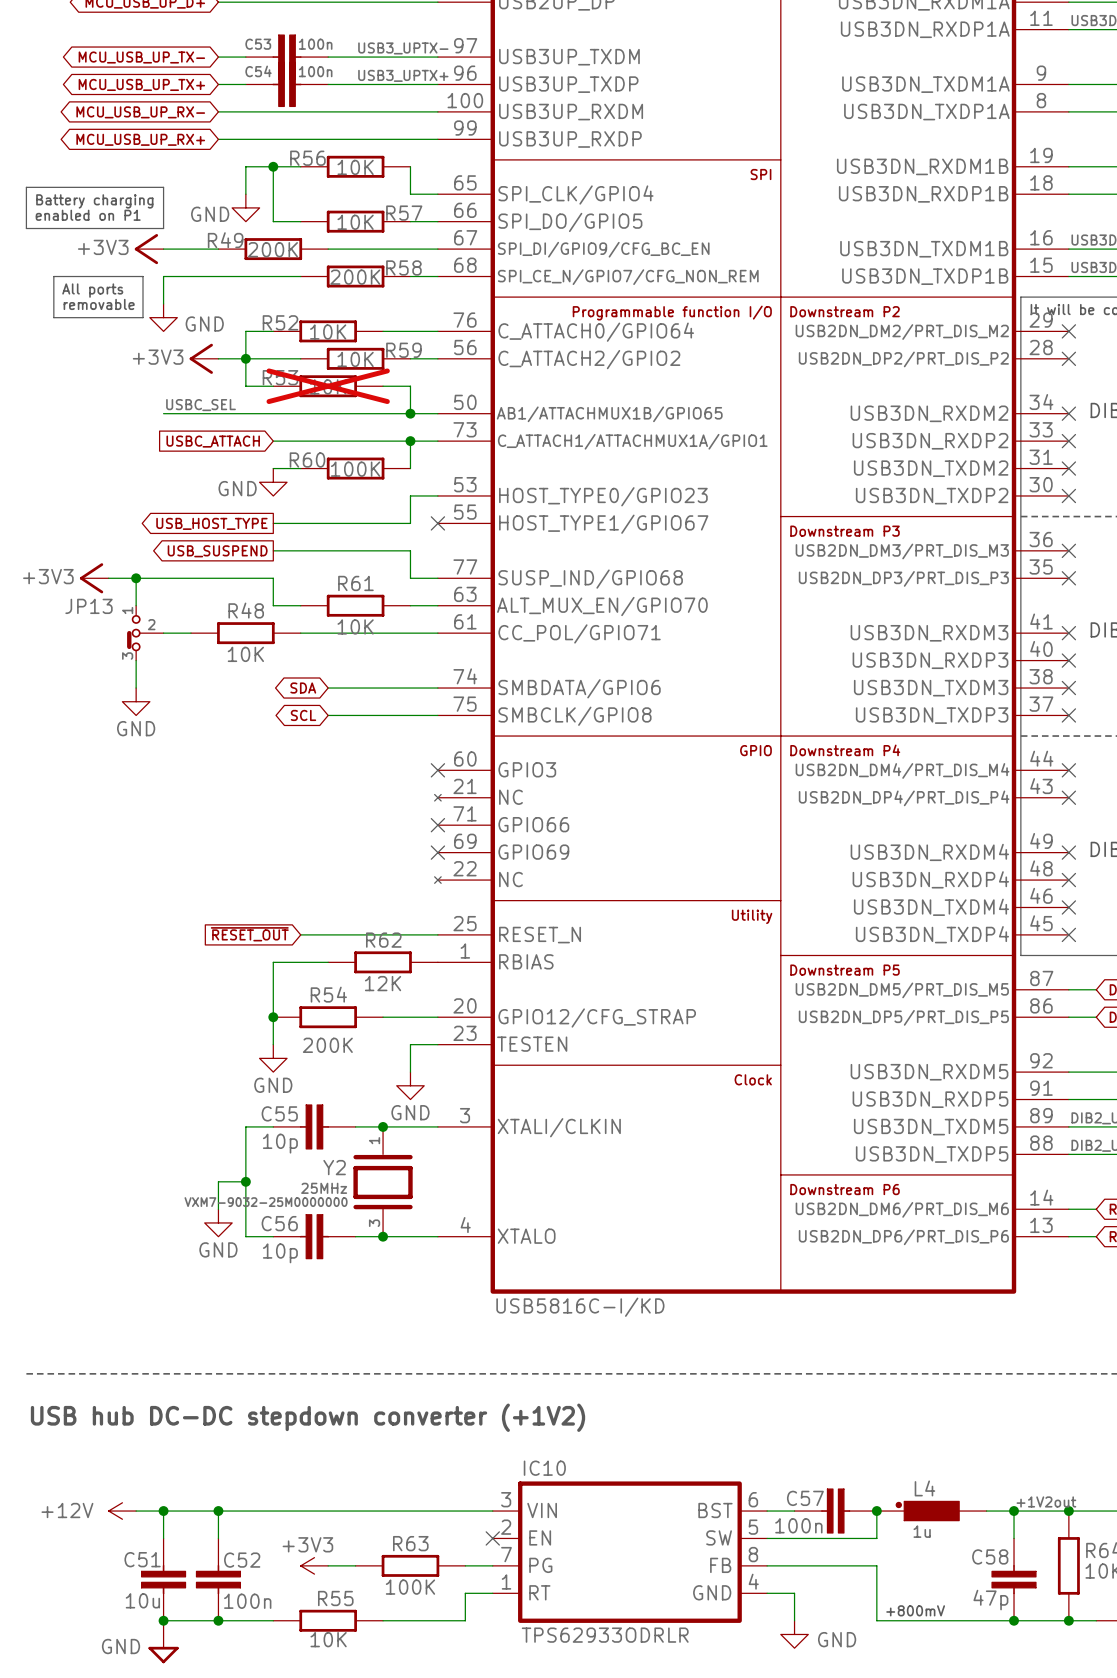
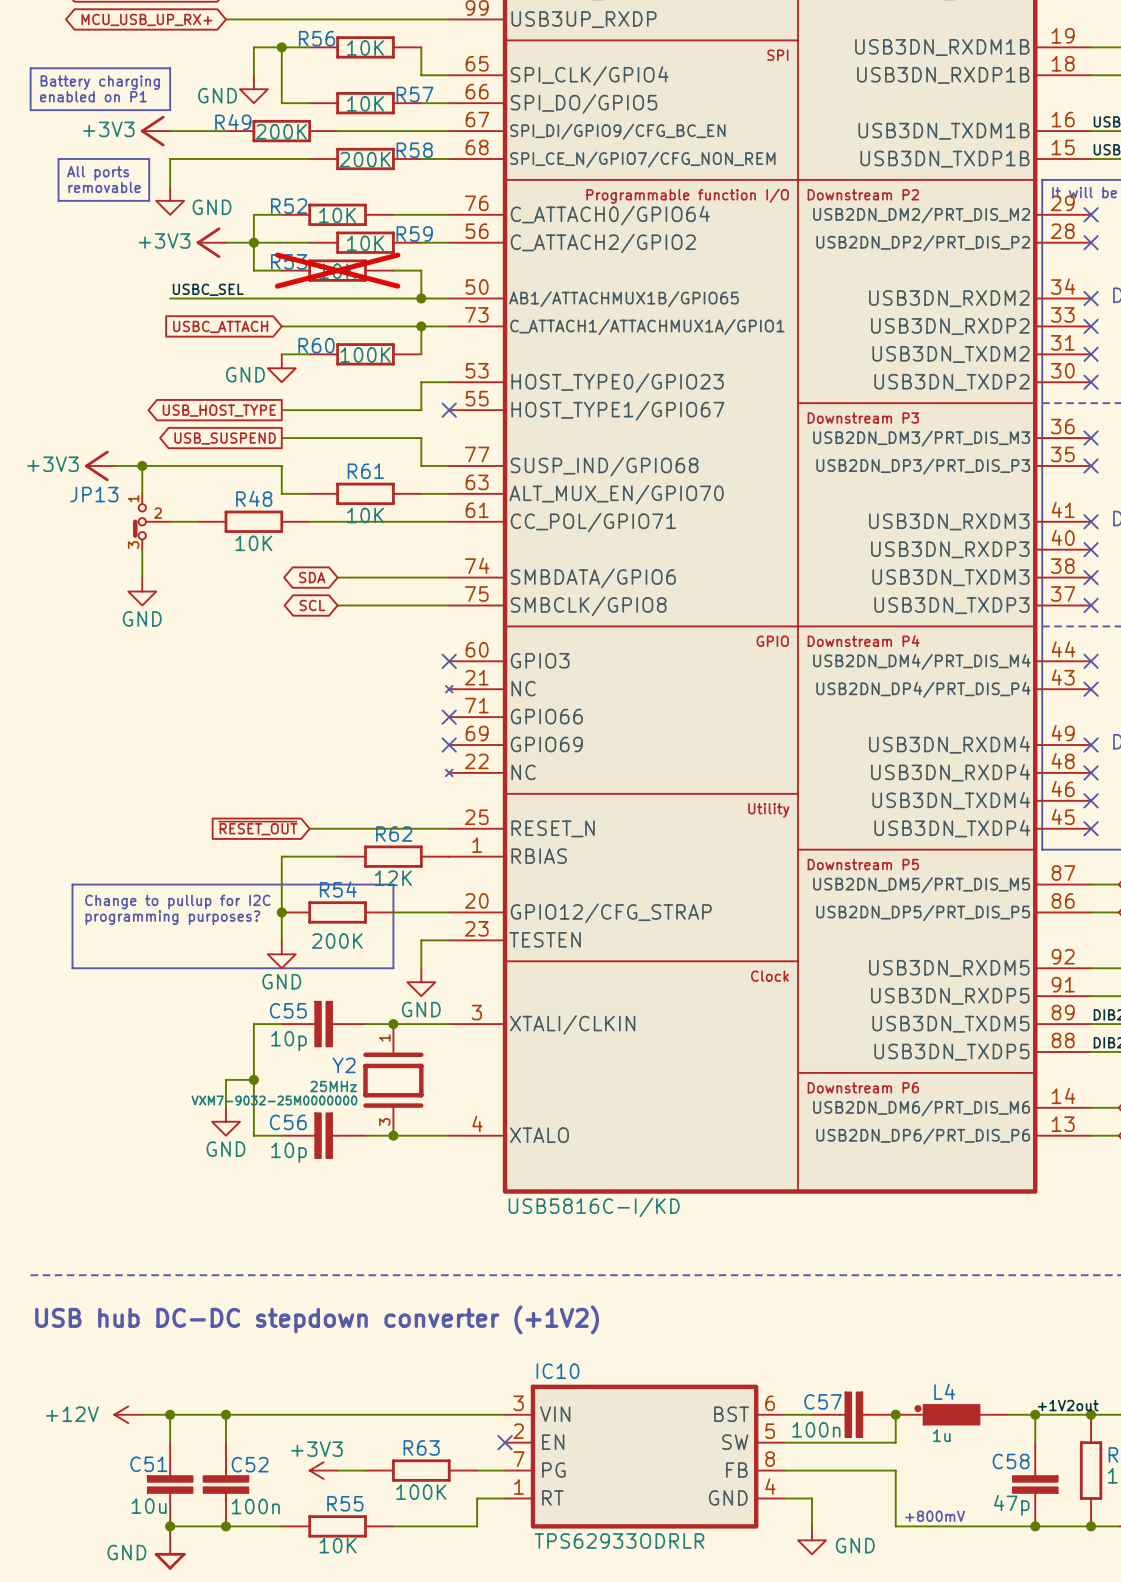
line: none -> (72, 884) (393, 884) (393, 968) (72, 968) (72, 884)
text: none -> Change to pullup for I2C (177, 901)
text: none -> programming purposes? (172, 917)

